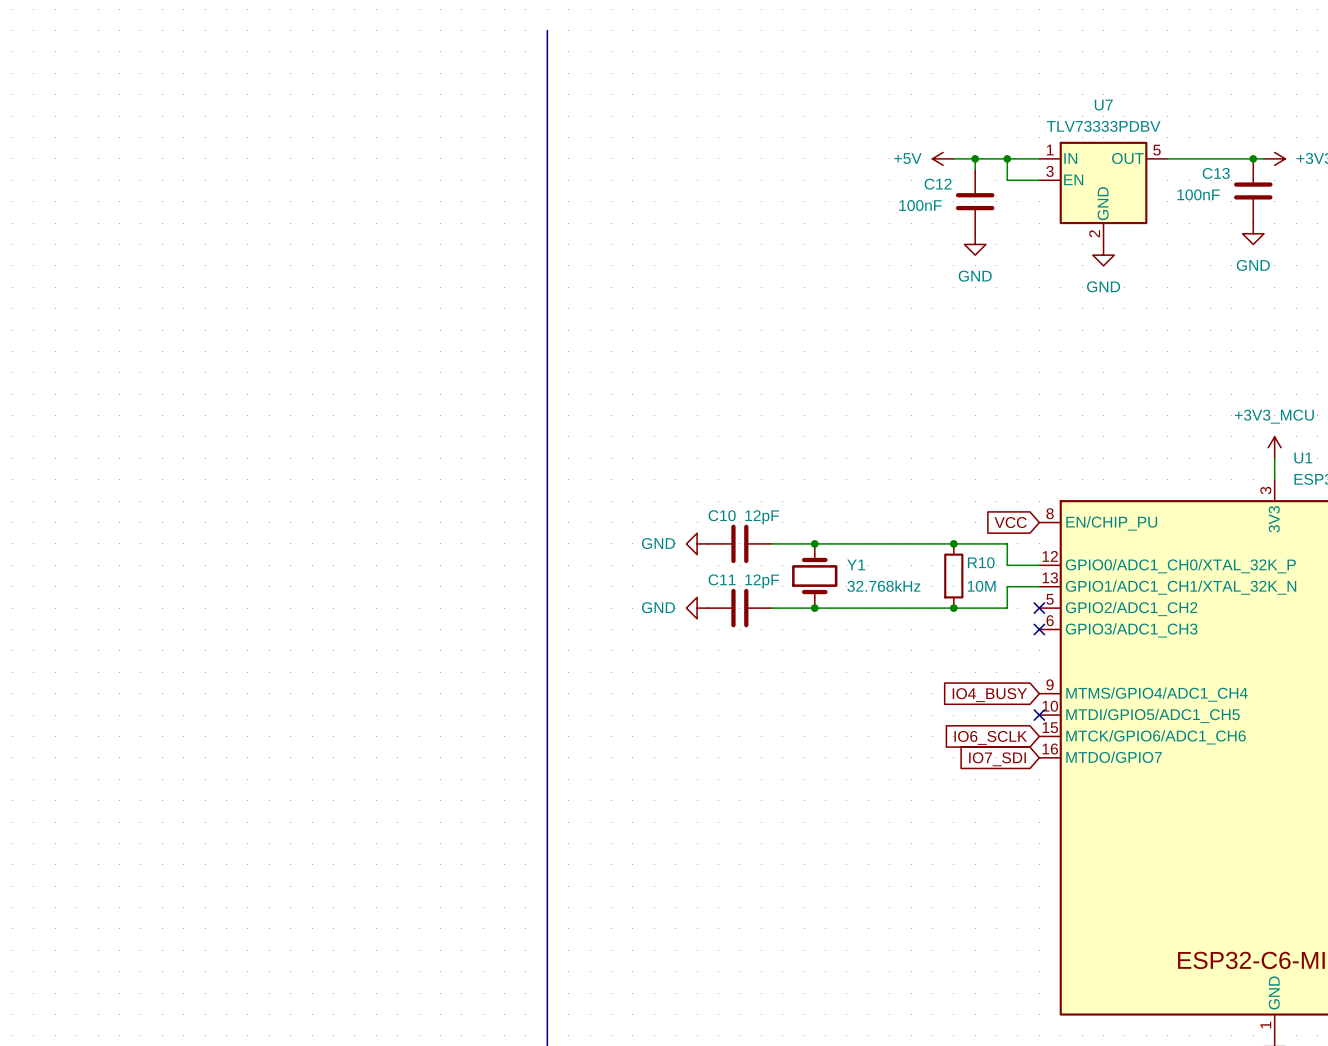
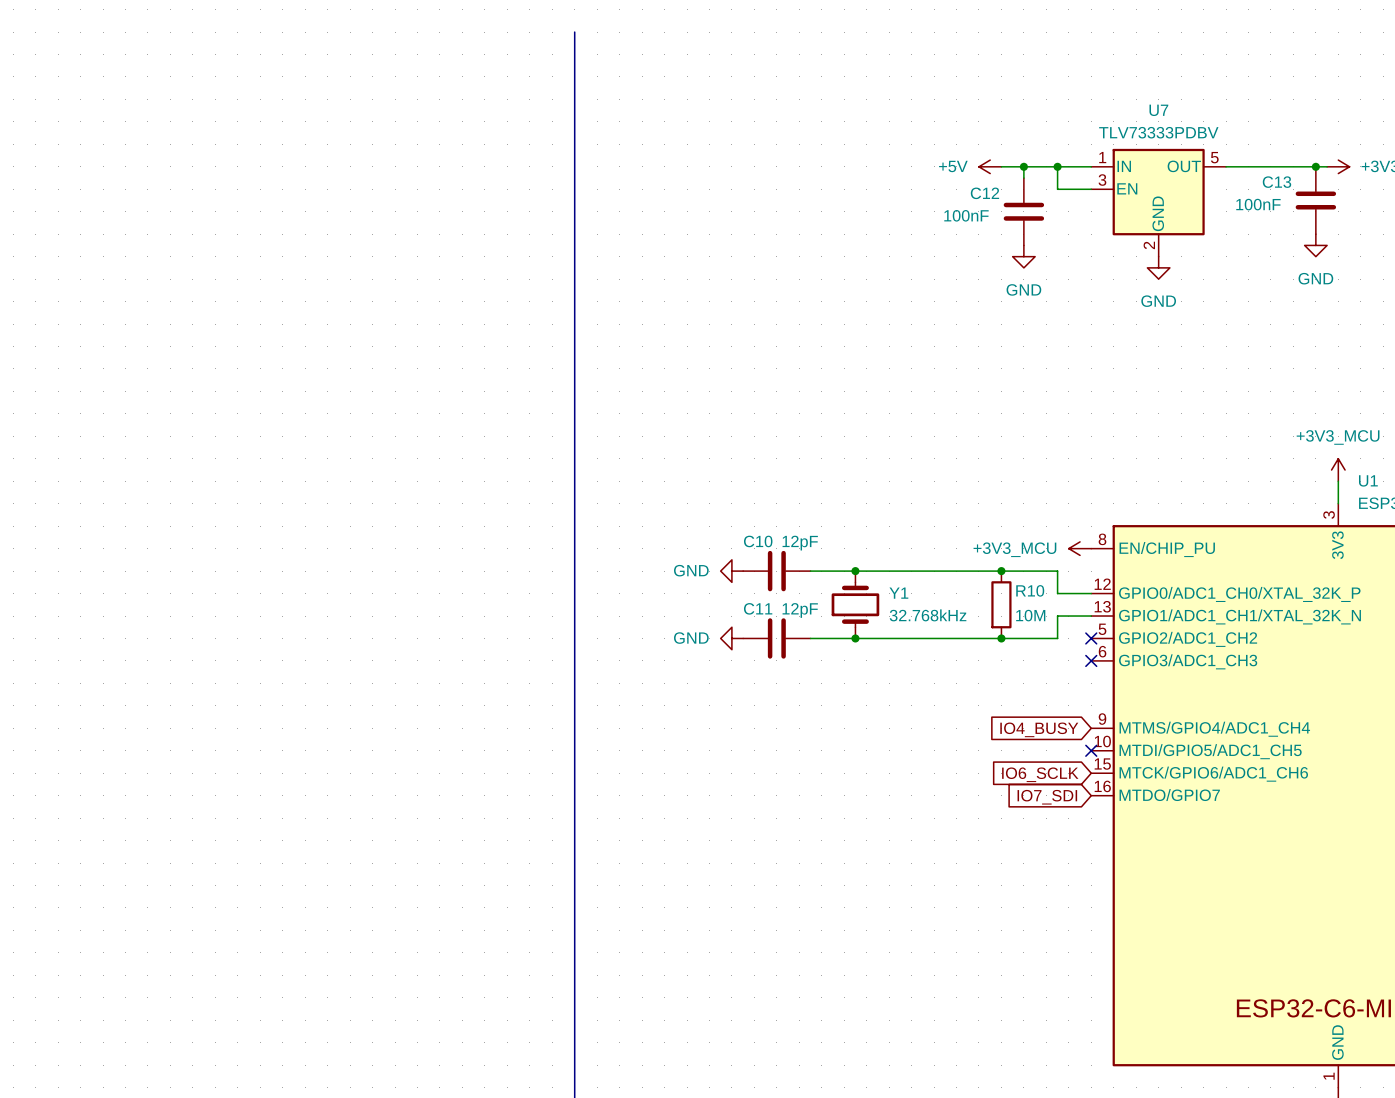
global label: VCC (1010, 522) -> none
power symbol: none -> +3V3_MCU (1080, 548)

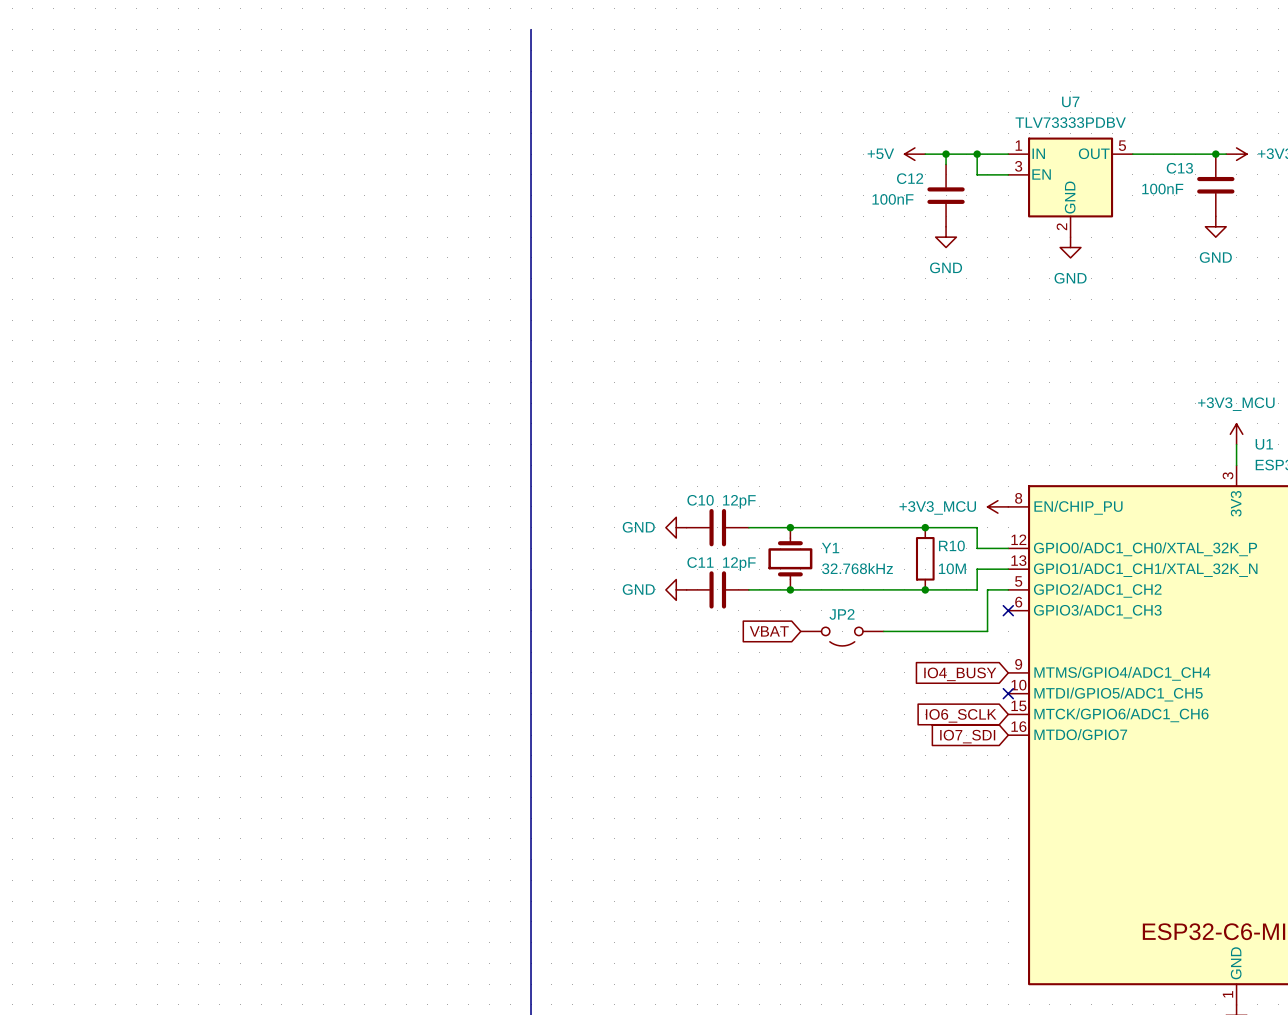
wire: none -> (1008, 589) (987, 589) (987, 631) (883, 631)
no-connect mark: (1091, 638) -> none
global label: none -> VBAT (769, 631)
JP2: none -> (842, 636)

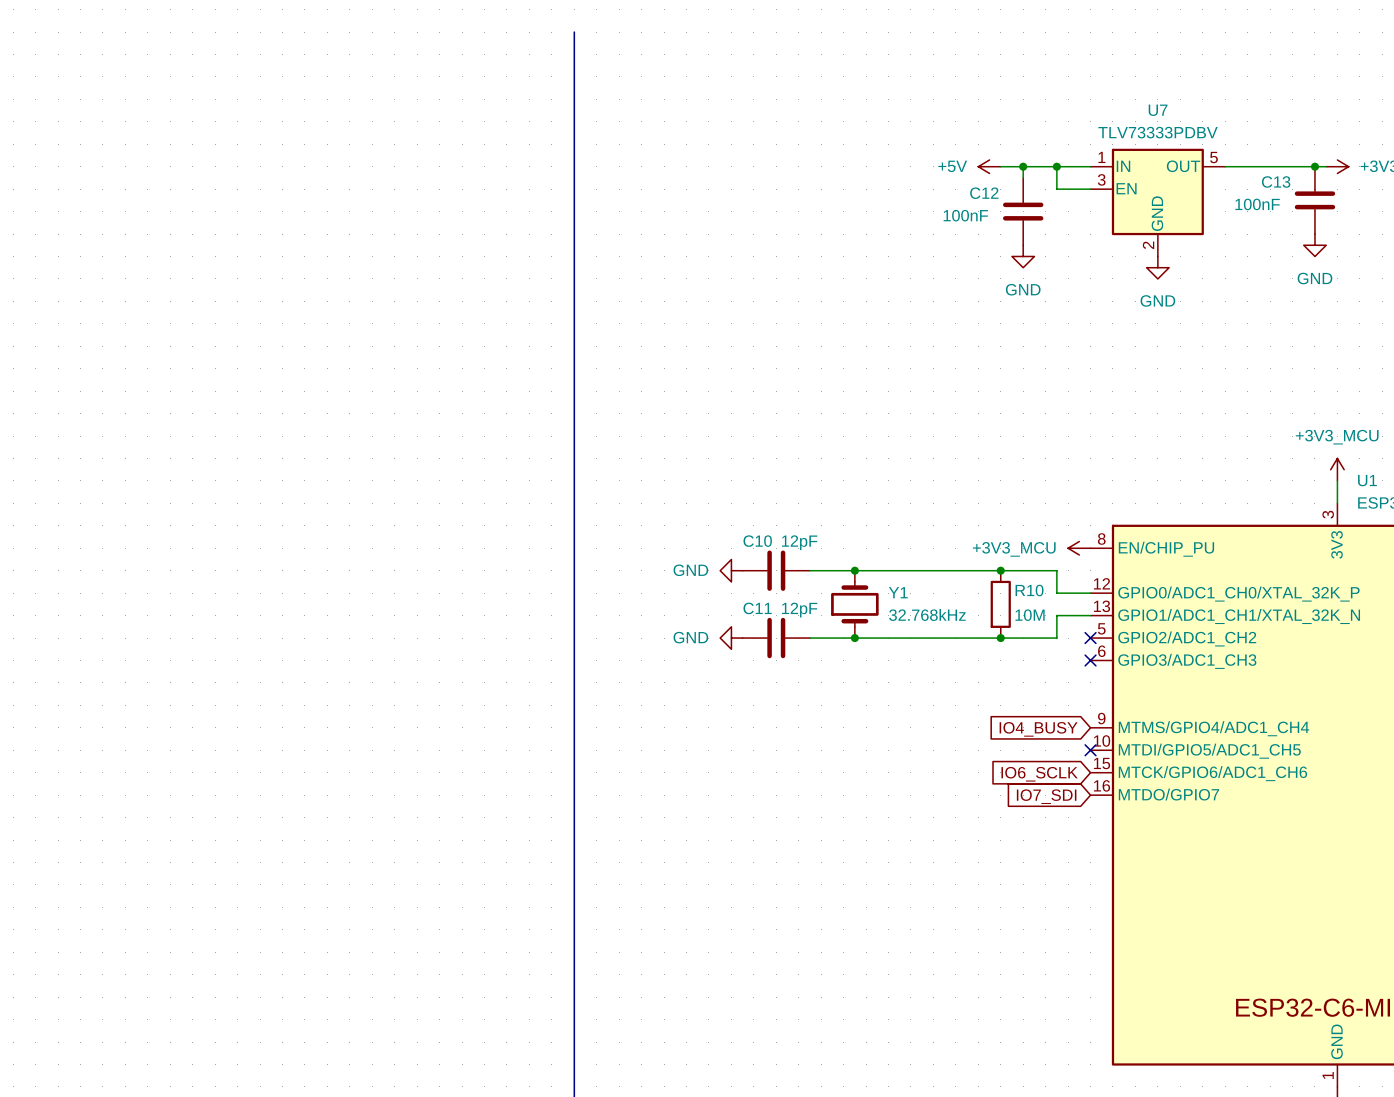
wire: (1008, 589) (987, 589) (987, 631) (883, 631) -> none
no-connect mark: none -> (1090, 638)
global label: VBAT (769, 631) -> none
JP2: (842, 636) -> none

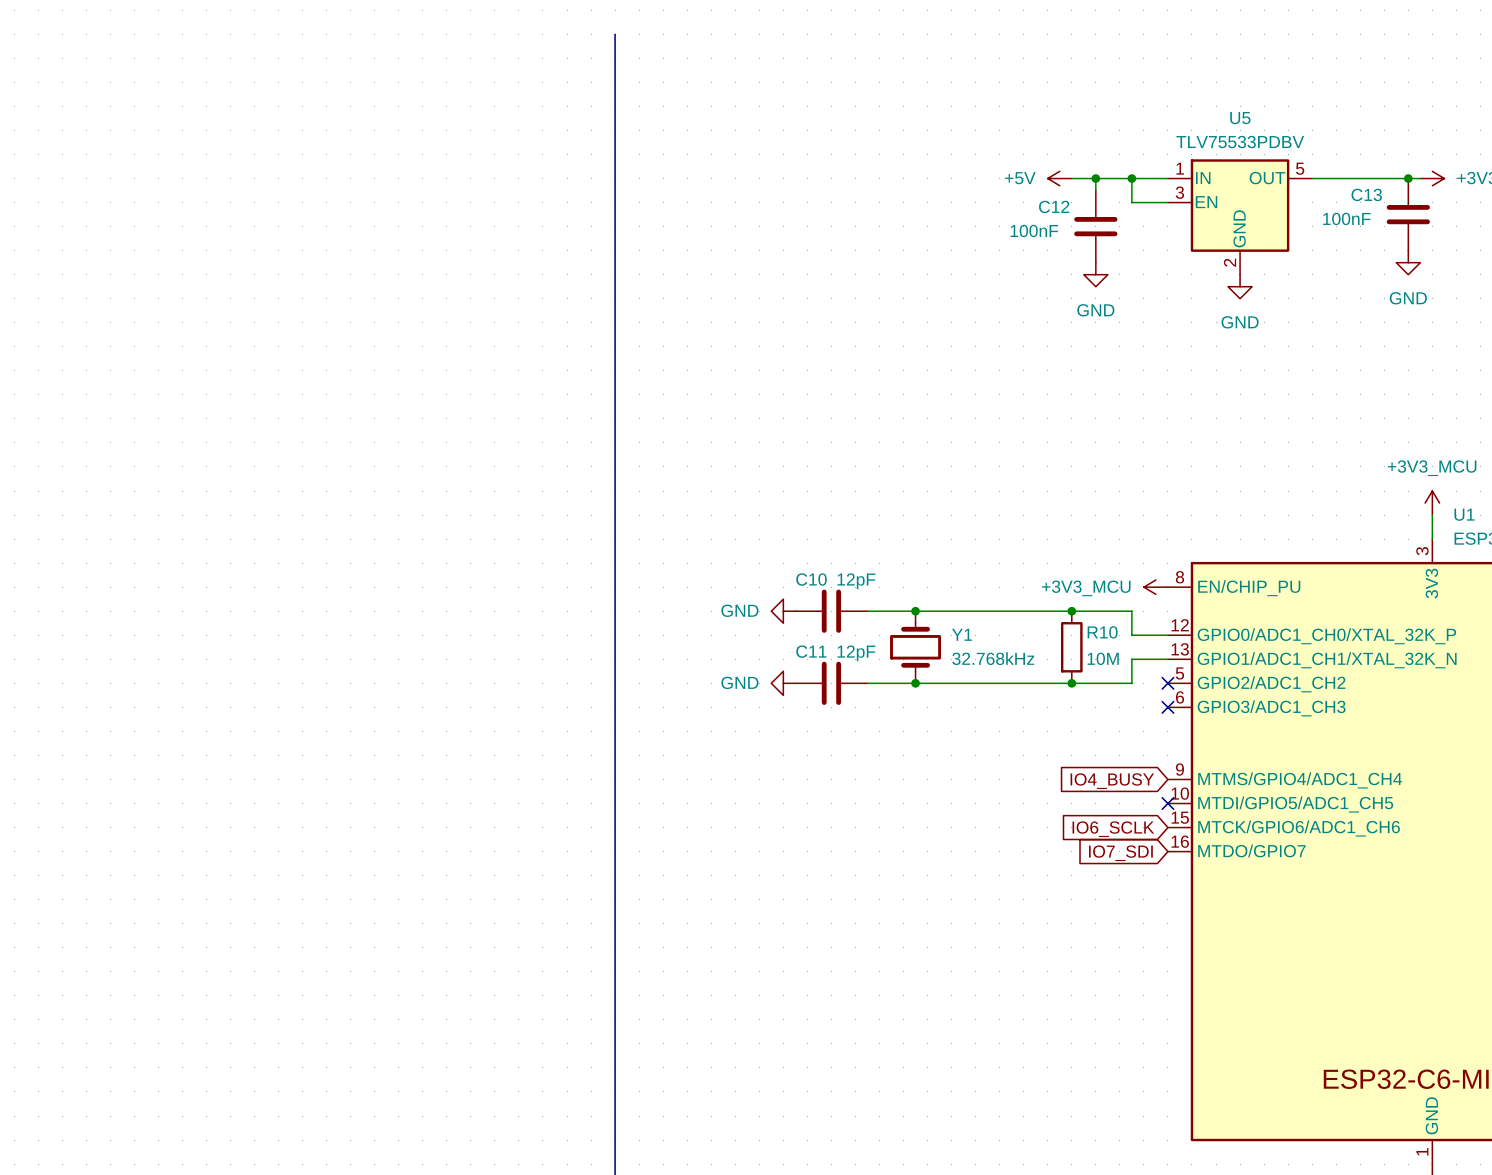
U7 name: U7 (1158, 110) -> U5 (1240, 118)
U7 value: TLV73333PDBV (1158, 132) -> TLV75533PDBV (1240, 142)

